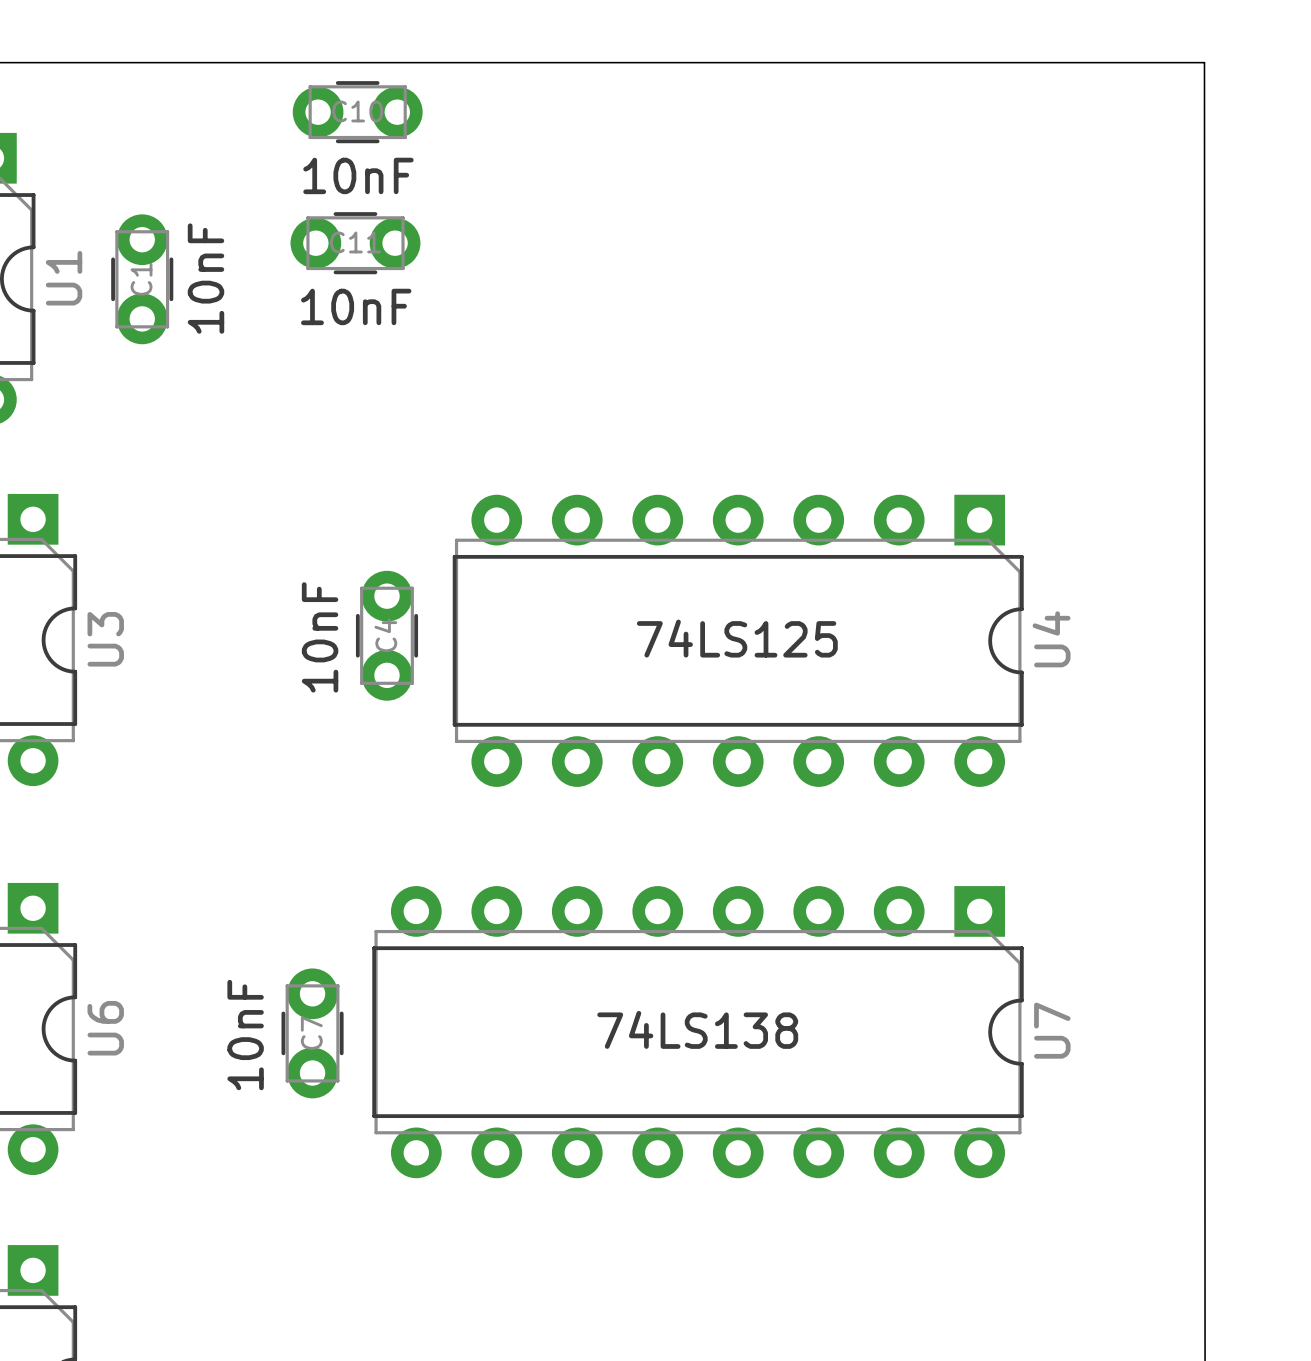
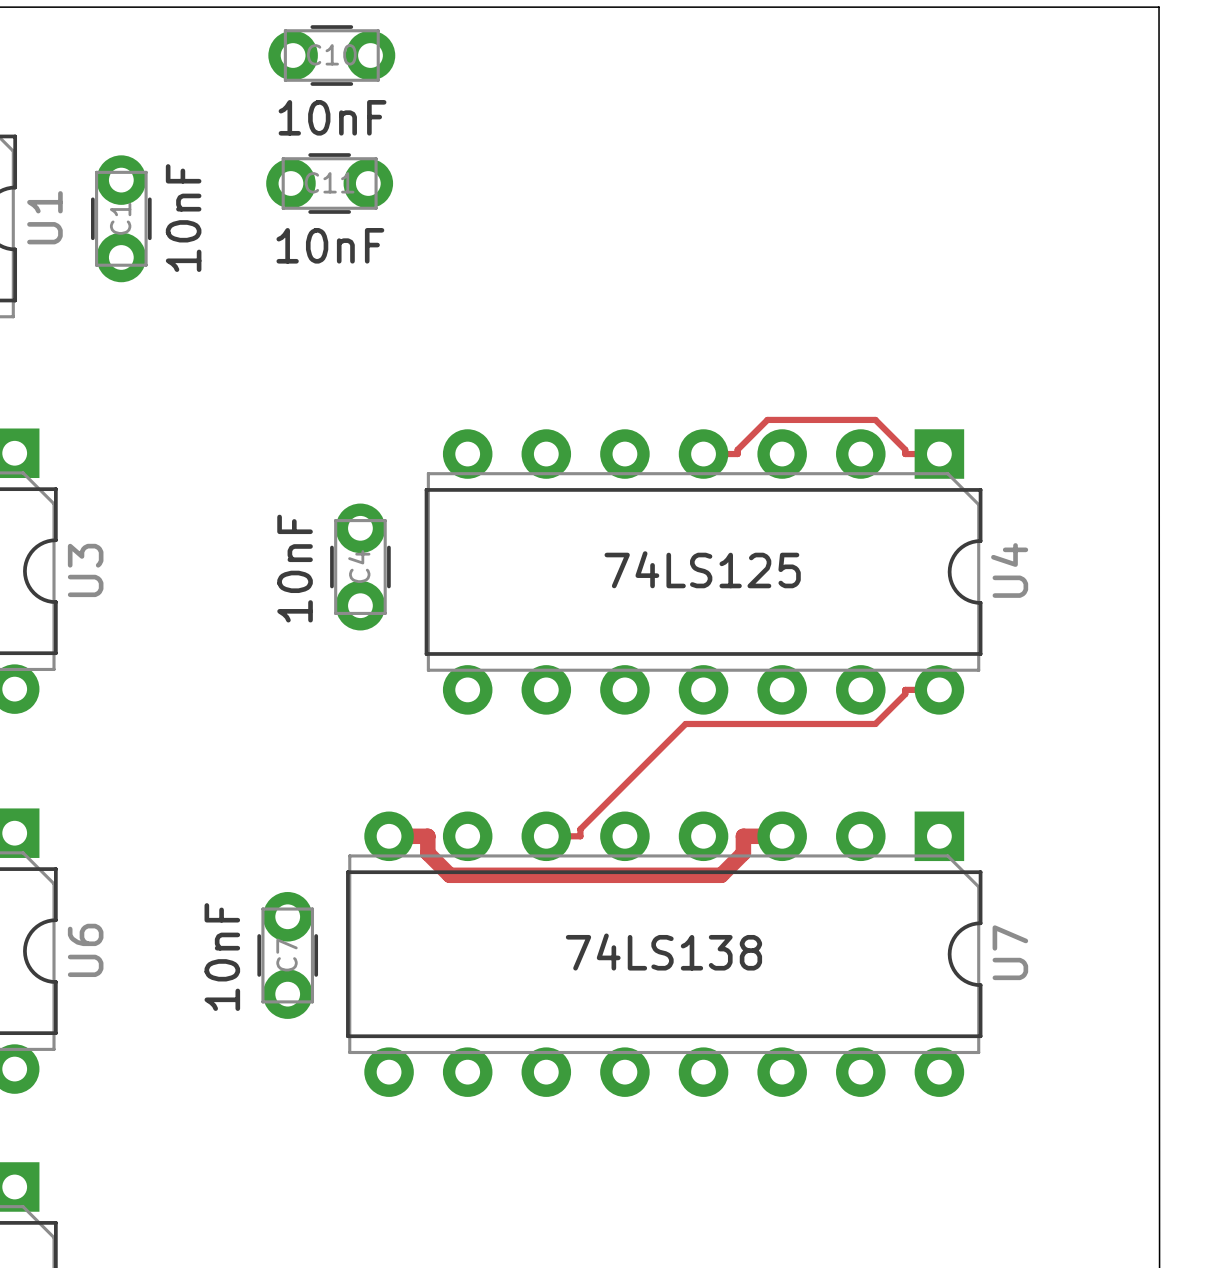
track: none -> (703, 454) (737, 454) (737, 449) (767, 419) (875, 419) (905, 449) (905, 454) (939, 454)
track: none -> (939, 689) (905, 689) (905, 694) (875, 723) (685, 723) (580, 829) (580, 836) (546, 836)
track: none -> (389, 836) (427, 836) (427, 853) (449, 875) (721, 875) (743, 853) (743, 836) (782, 836)

